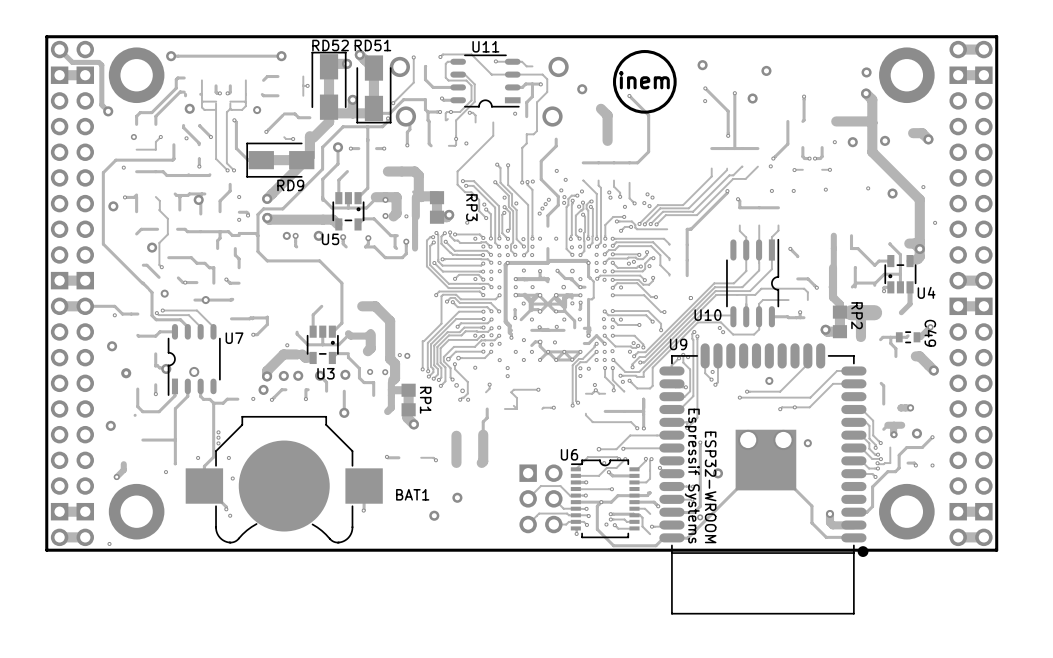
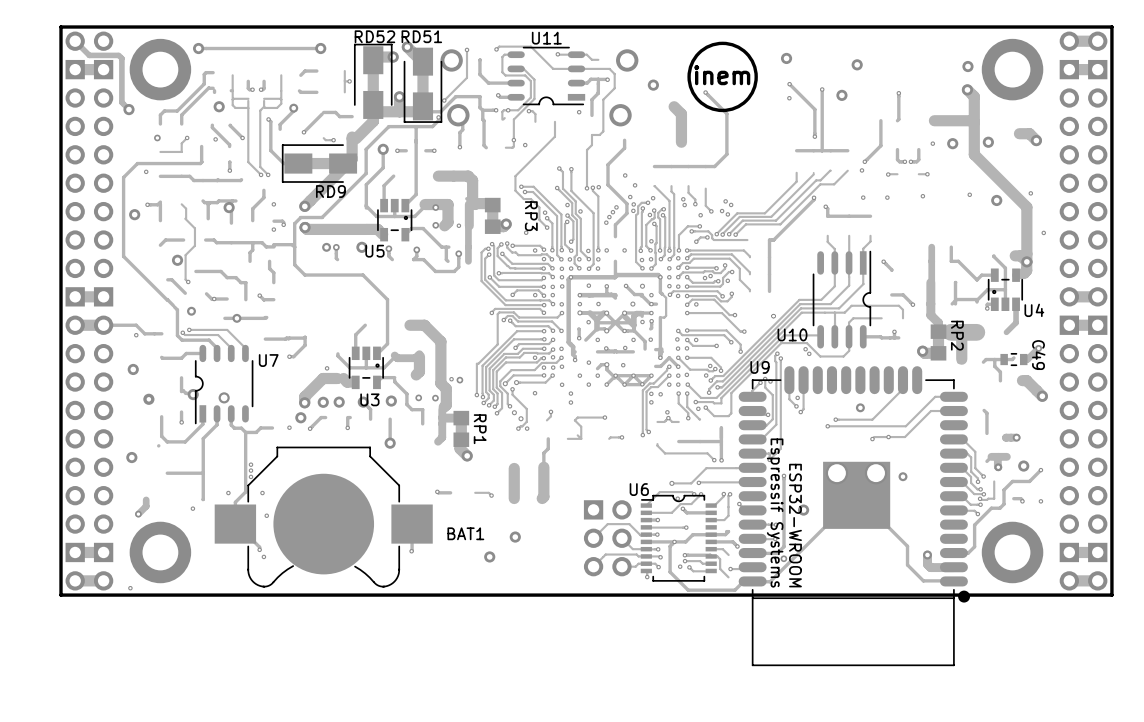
track: none -> (293, 108) (293, 110) (280, 124) (280, 129)

